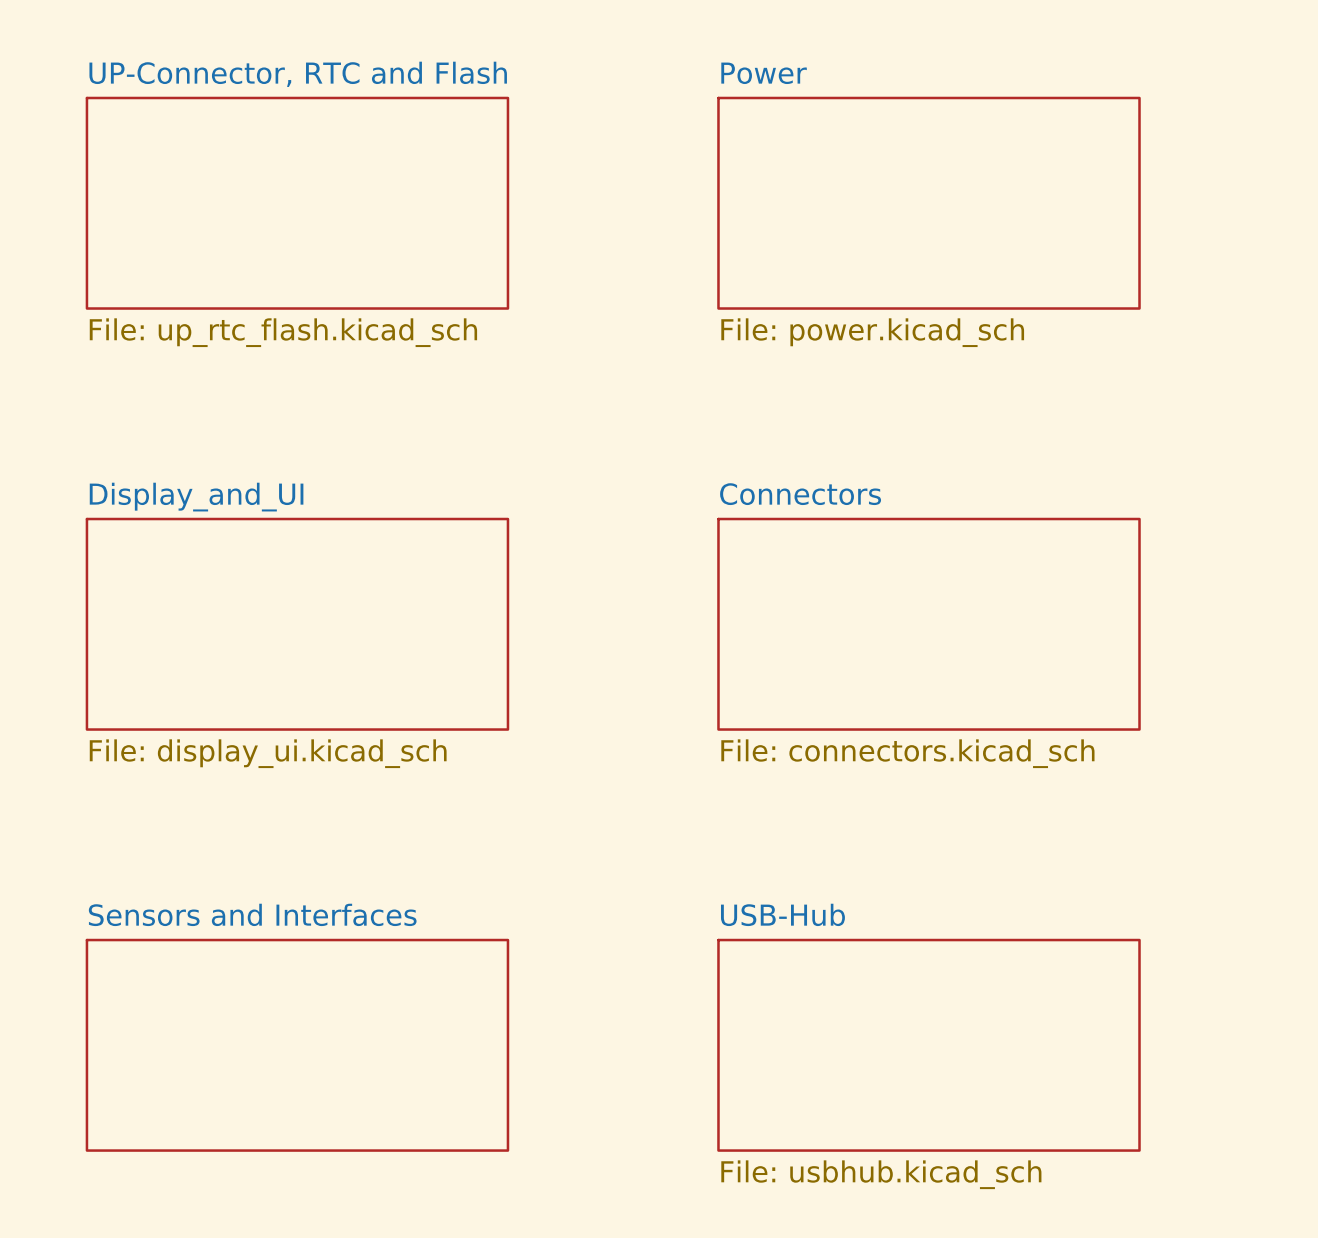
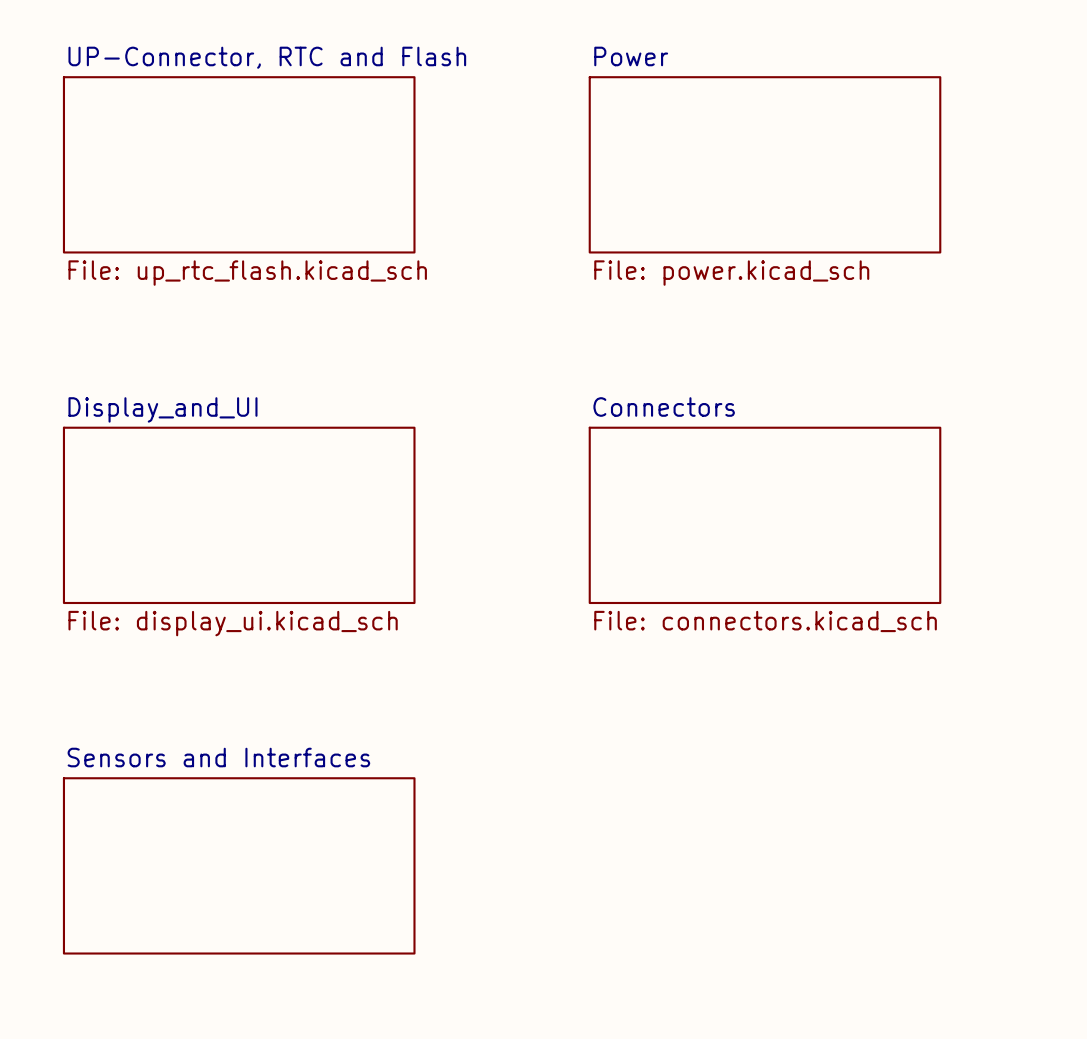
sheet USB-Hub: File: usbhub.kicad_sch (928, 1045) -> none

